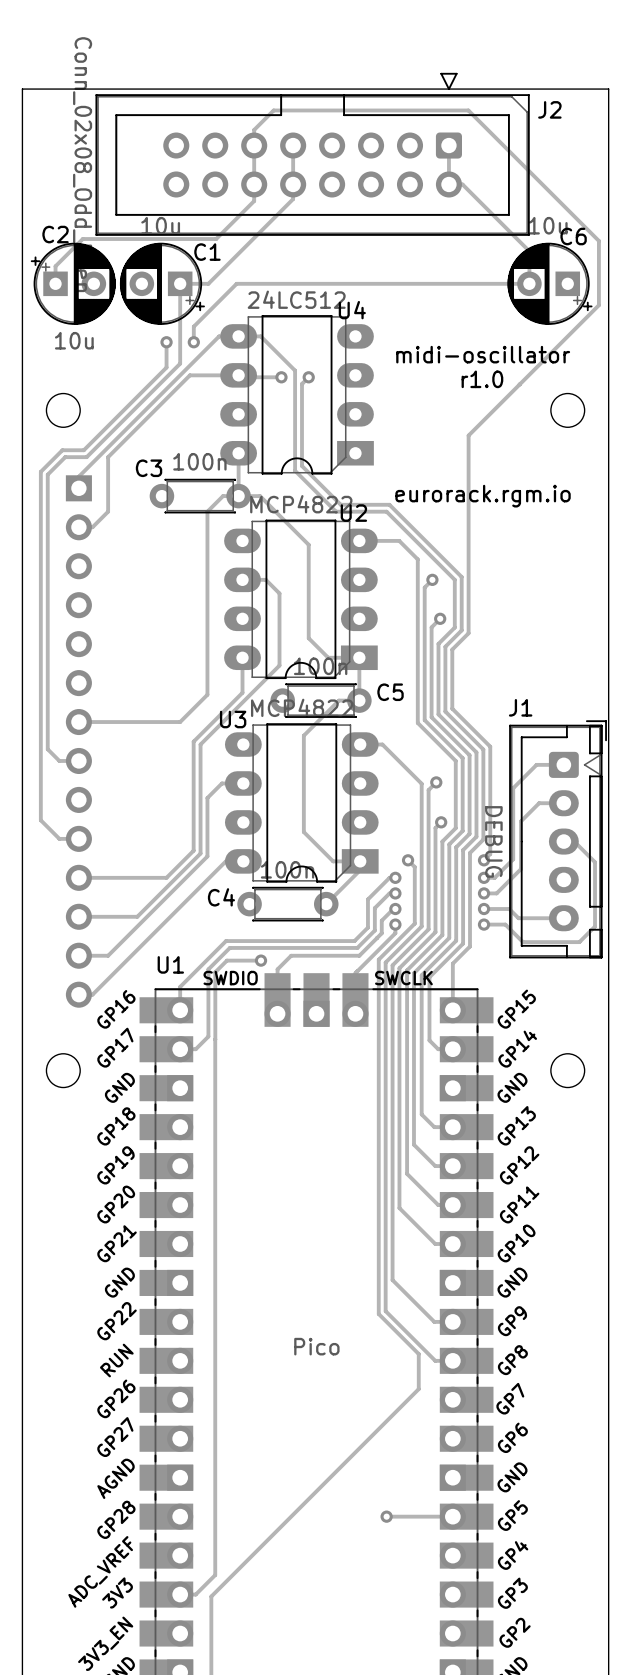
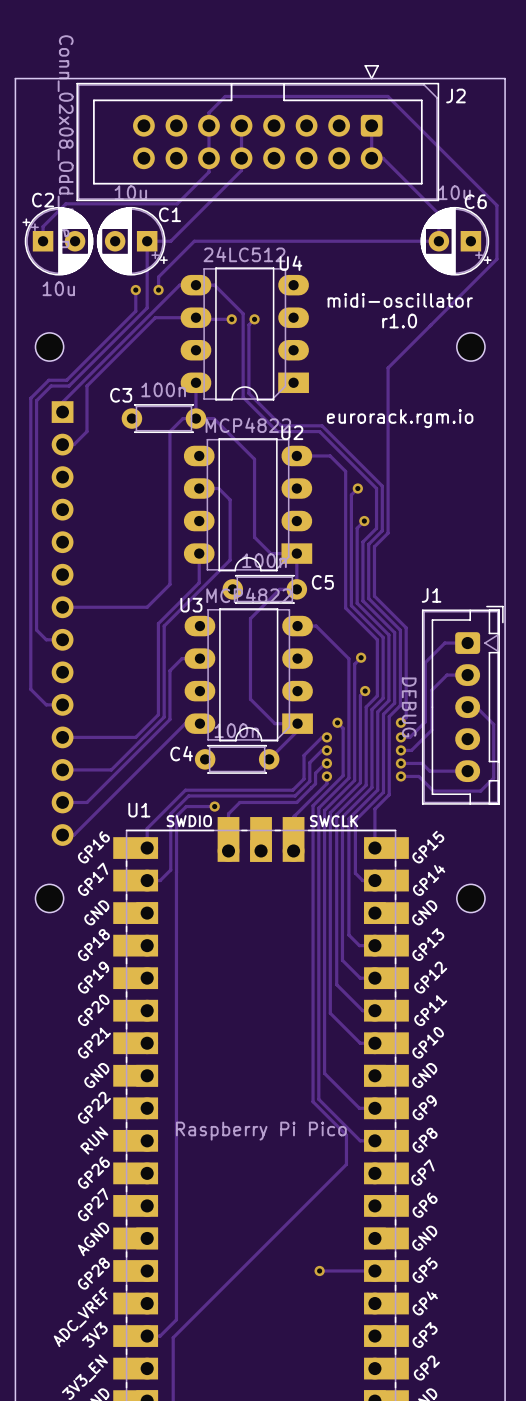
U1 value: Pico (316, 1346) -> Raspberry Pi Pico (261, 1131)

